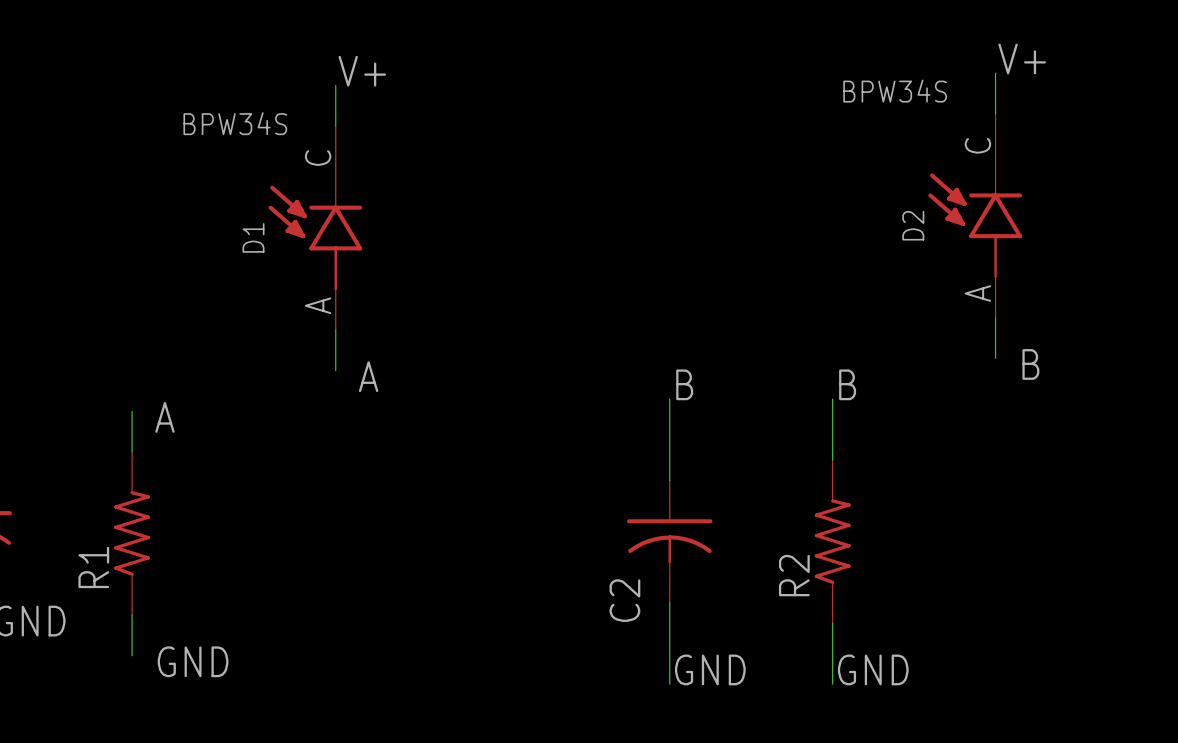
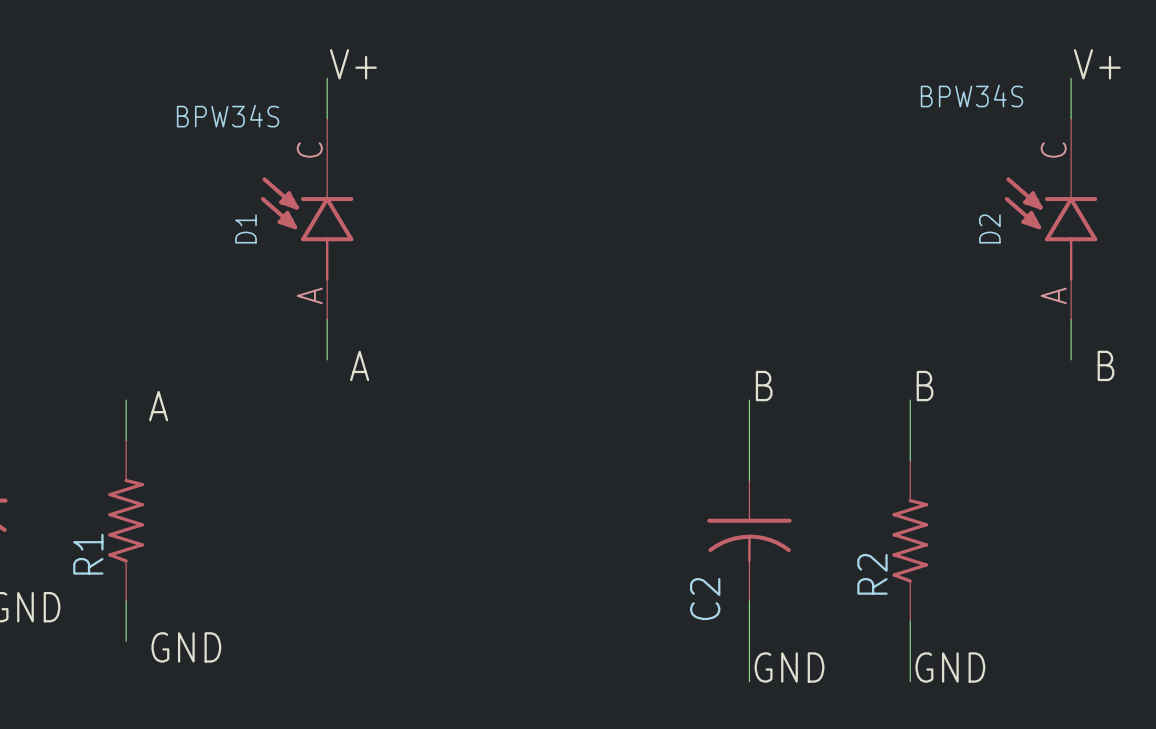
label position: V+ (1022, 58) -> V+ (1097, 64)
wire: (995, 73) (995, 113) -> (1071, 78) (1071, 118)
D2 position: (975, 215) -> (1051, 219)
wire: (995, 317) (995, 358) -> (1071, 319) (1071, 359)
label: B (1030, 364) -> none
label: none -> B (1105, 365)
label: B (684, 384) -> none
label: B (847, 384) -> none
label: none -> B (764, 386)
label: none -> B (925, 386)
wire: (669, 399) (669, 480) -> (749, 400) (749, 480)
wire: (832, 399) (832, 460) -> (910, 400) (910, 460)
C2 position: (669, 541) -> (749, 540)
R2 position: (832, 541) -> (910, 540)
wire: (669, 602) (669, 684) -> (749, 601) (749, 681)
wire: (832, 623) (832, 684) -> (910, 621) (910, 681)
label: GND (710, 669) -> none
label: GND (873, 669) -> none
label: none -> GND (789, 667)
label: none -> GND (950, 667)

